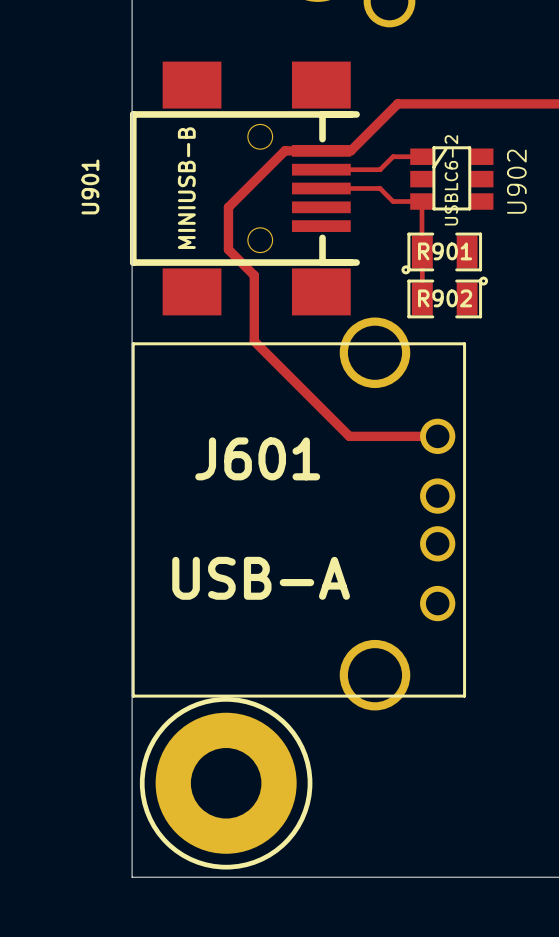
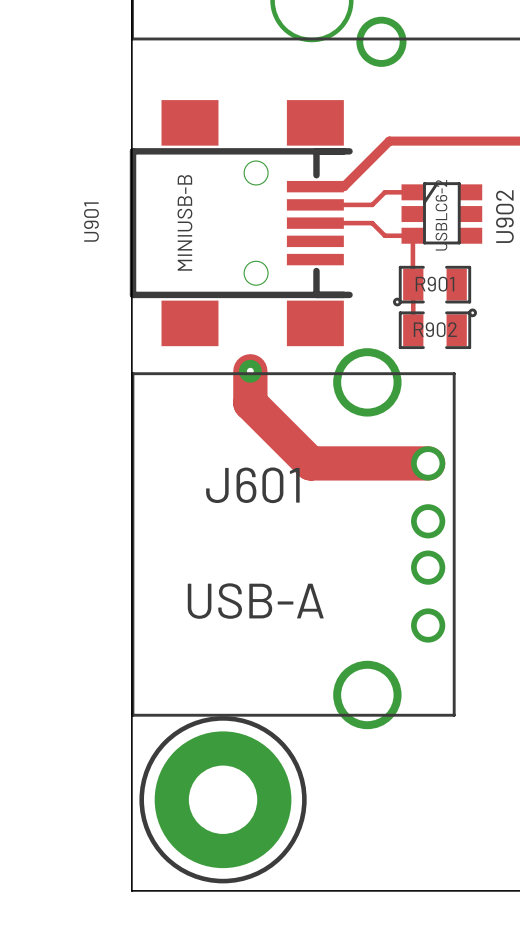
track: (321, 150) (284, 150) (228, 207) (228, 249) (254, 275) (254, 341) (349, 436) -> (250, 371) (250, 403) (310, 463) (342, 463)
via: none -> (250, 371)
track width: thin (349, 436) (437, 436) -> thick (342, 463) (428, 463)

